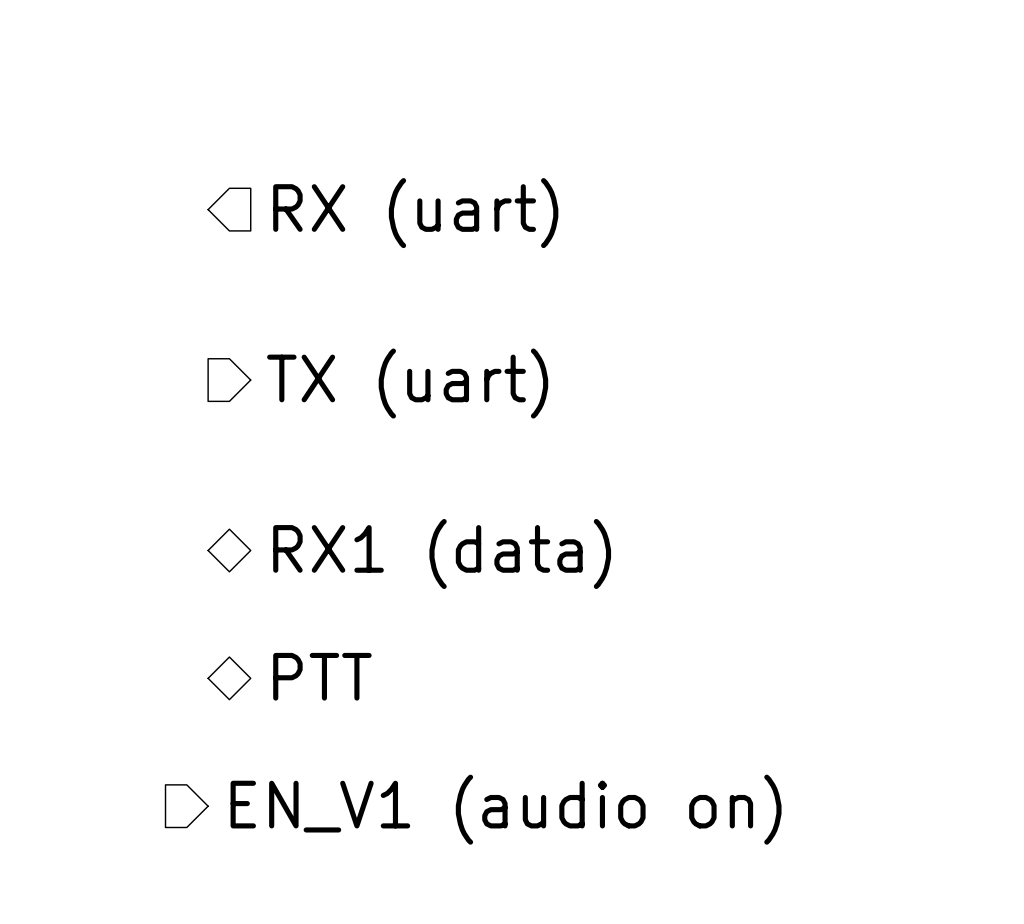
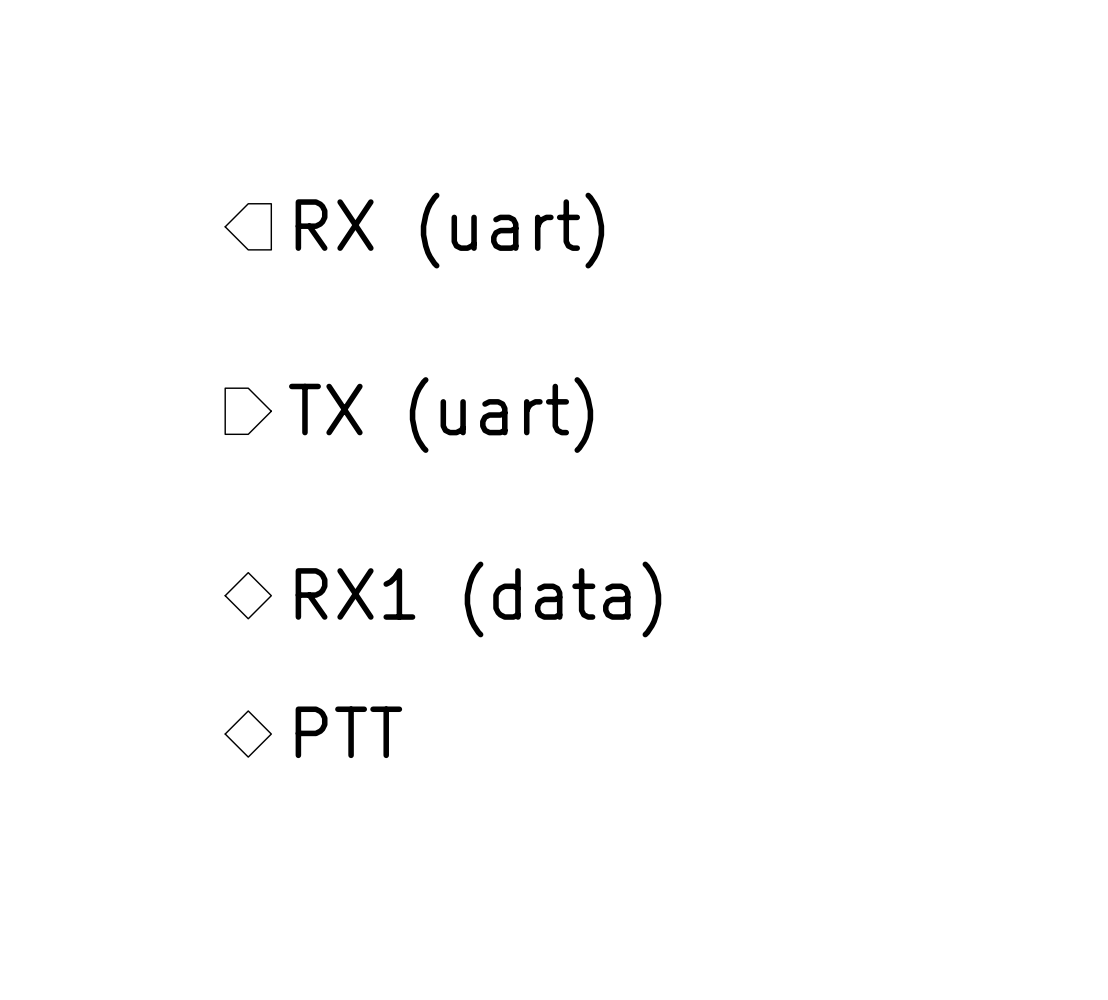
hierarchical label: EN_V1 (audio on) (506, 809) -> none

